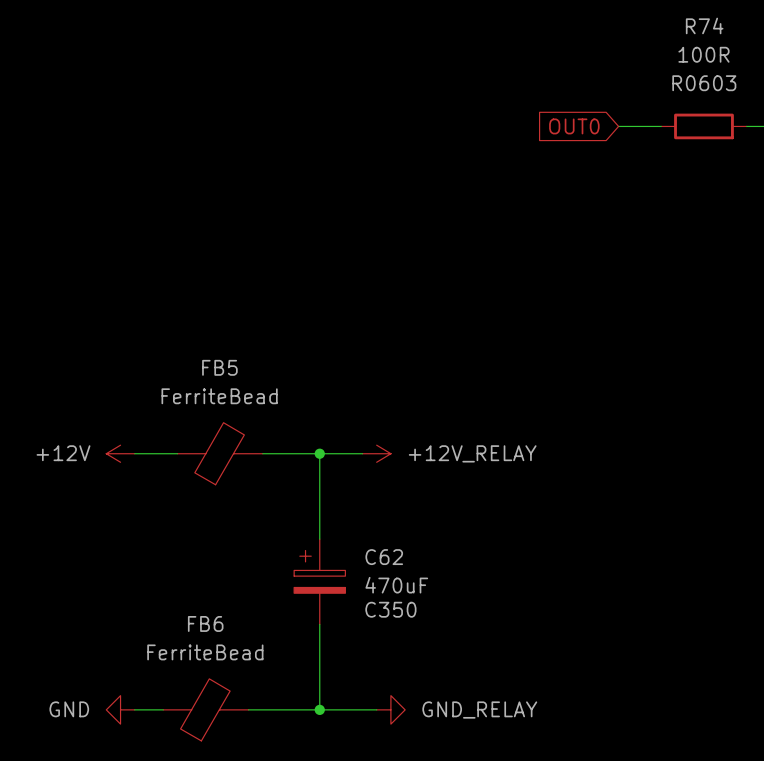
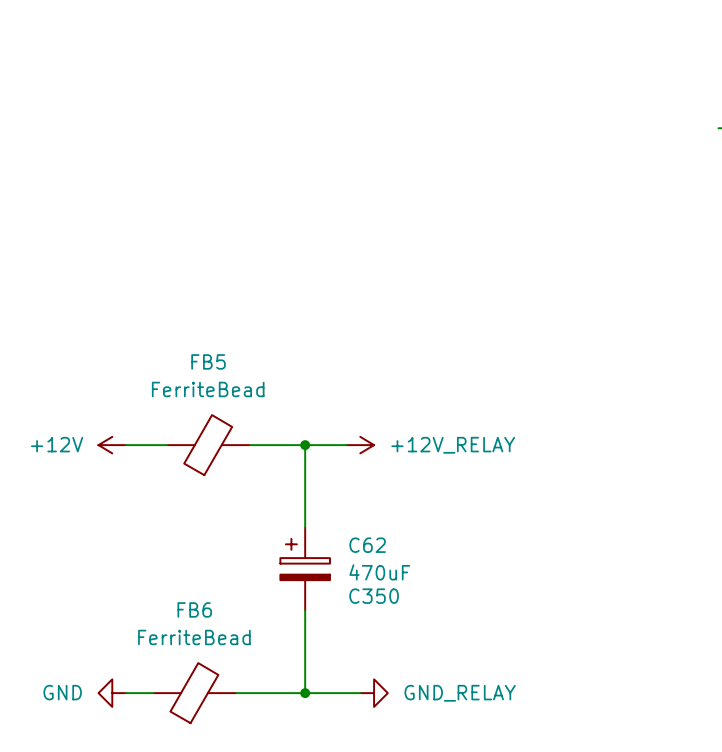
global label: OUT0 (574, 126) -> none
wire: (618, 126) (661, 126) -> none
R74: 100R (703, 126) -> none

